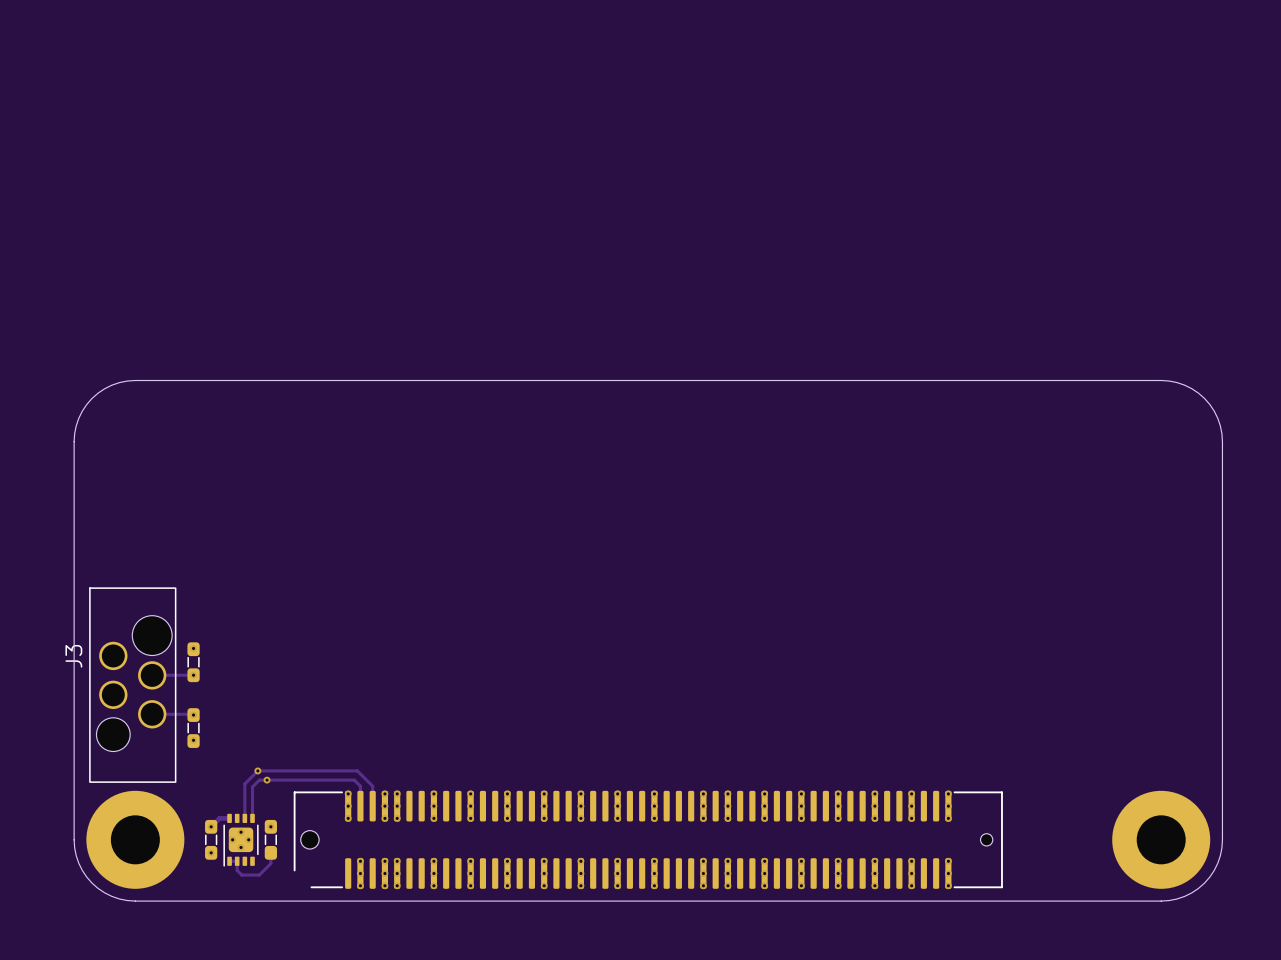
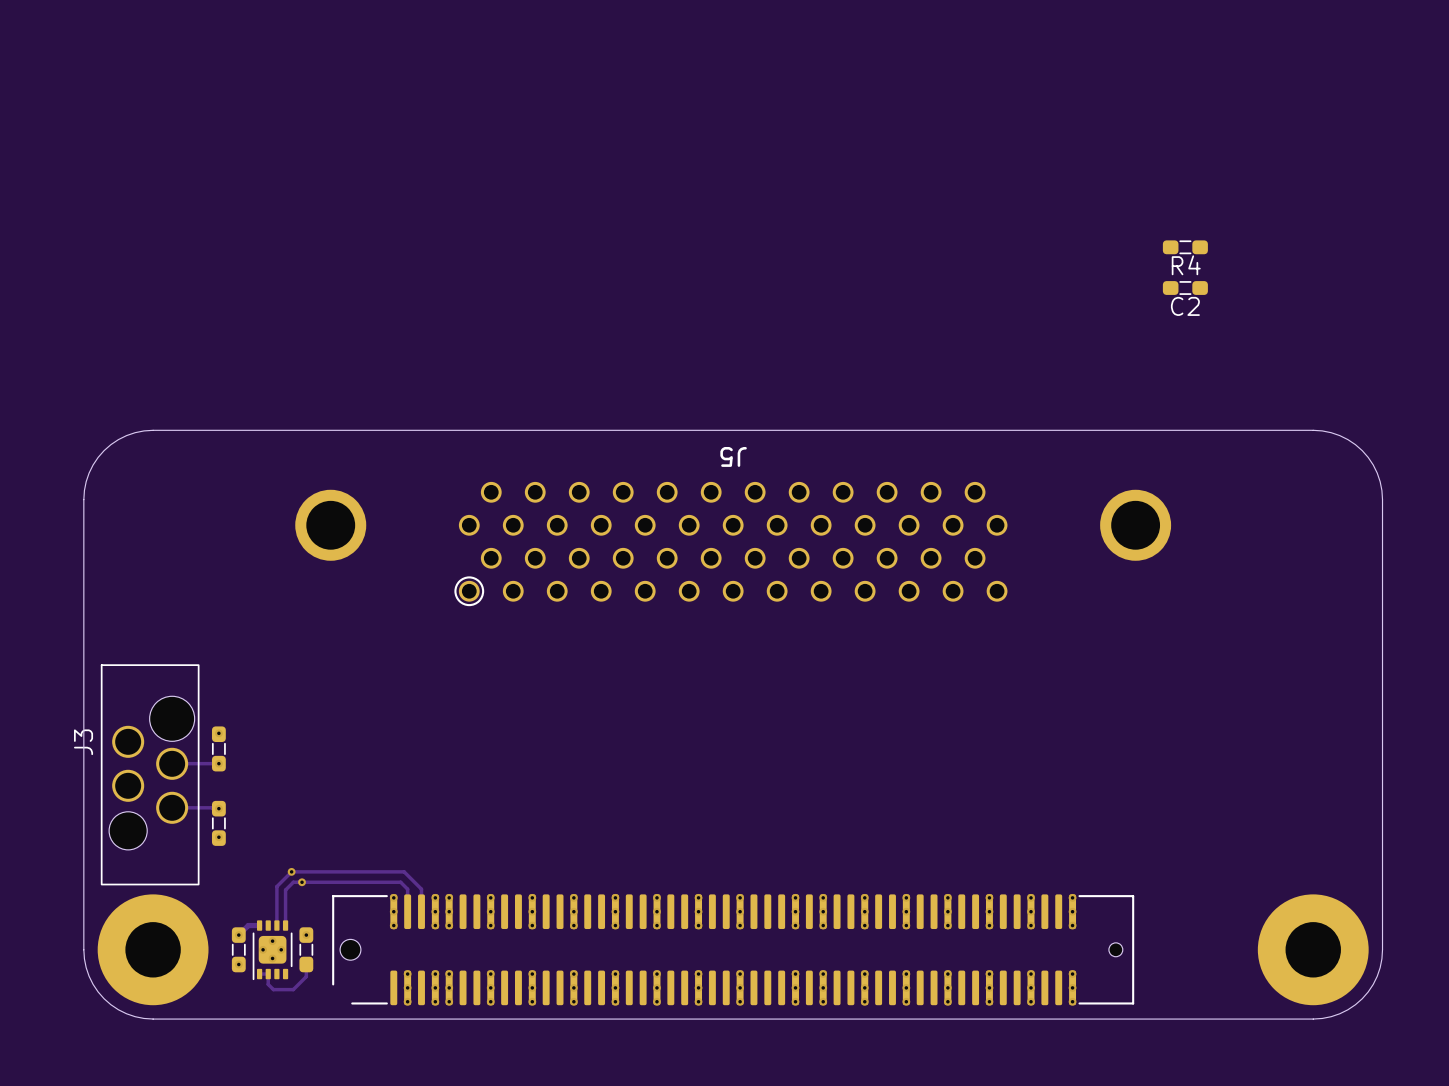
R4: none -> (1185, 247)
C2: none -> (1185, 288)
J5: none -> (733, 544)

